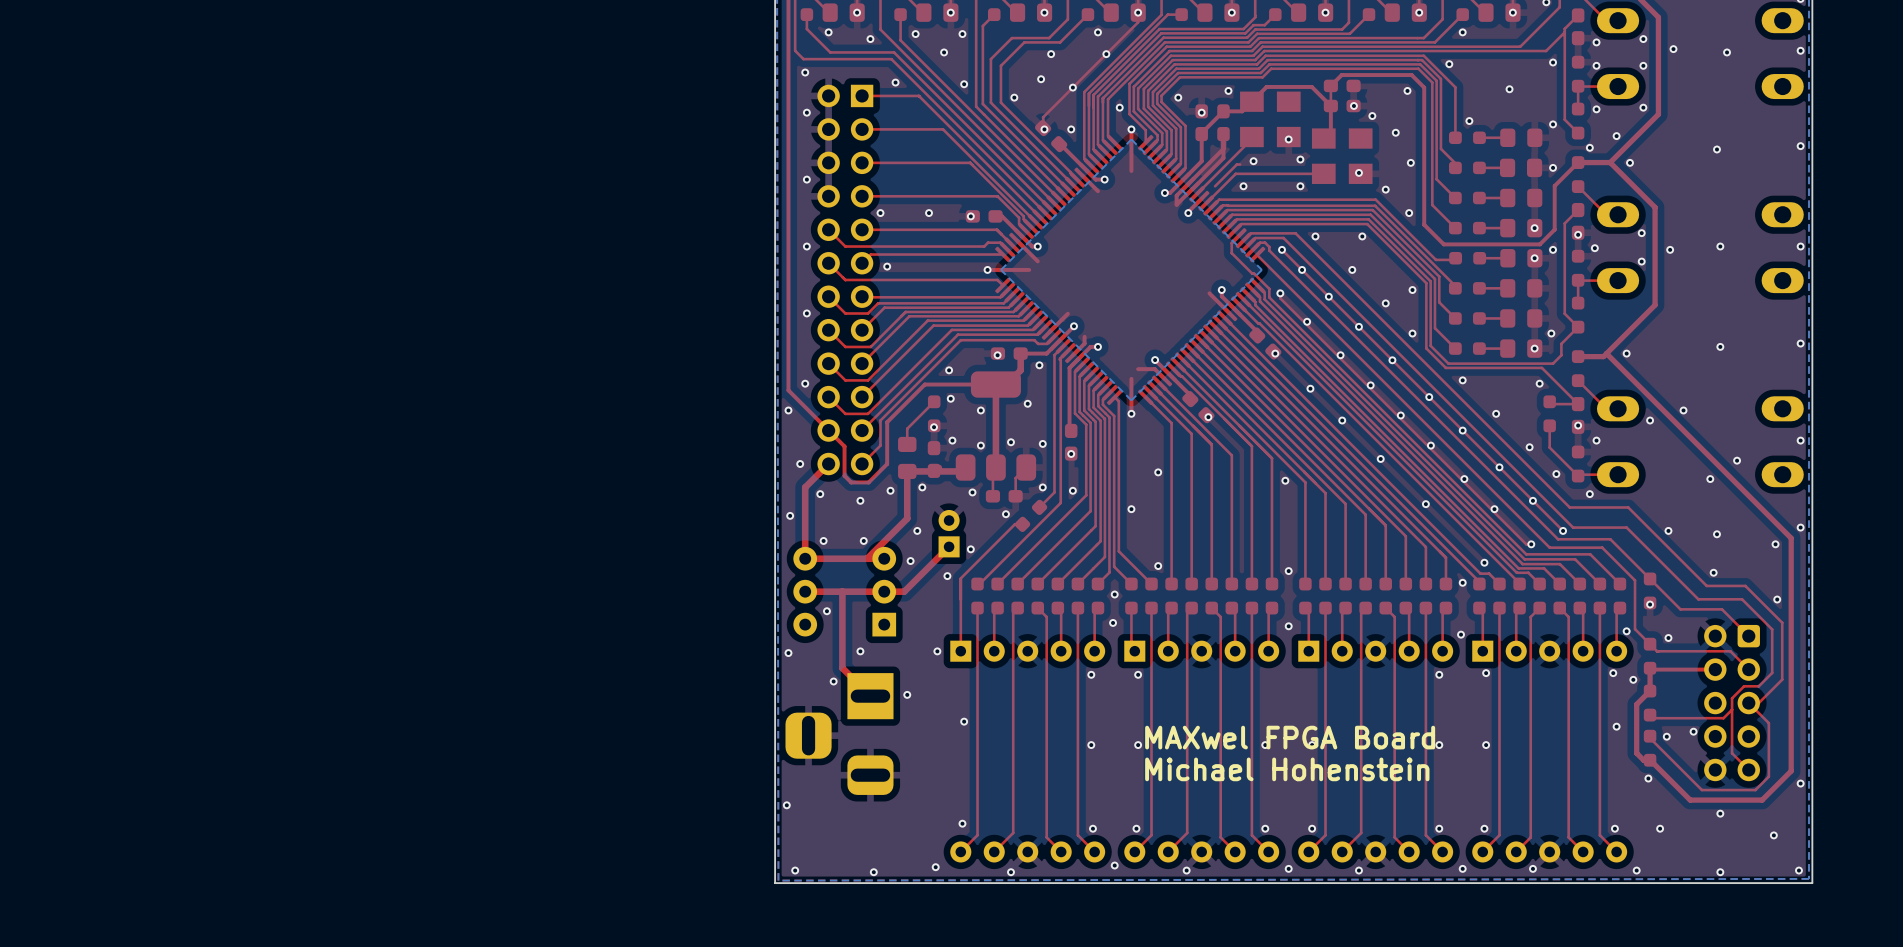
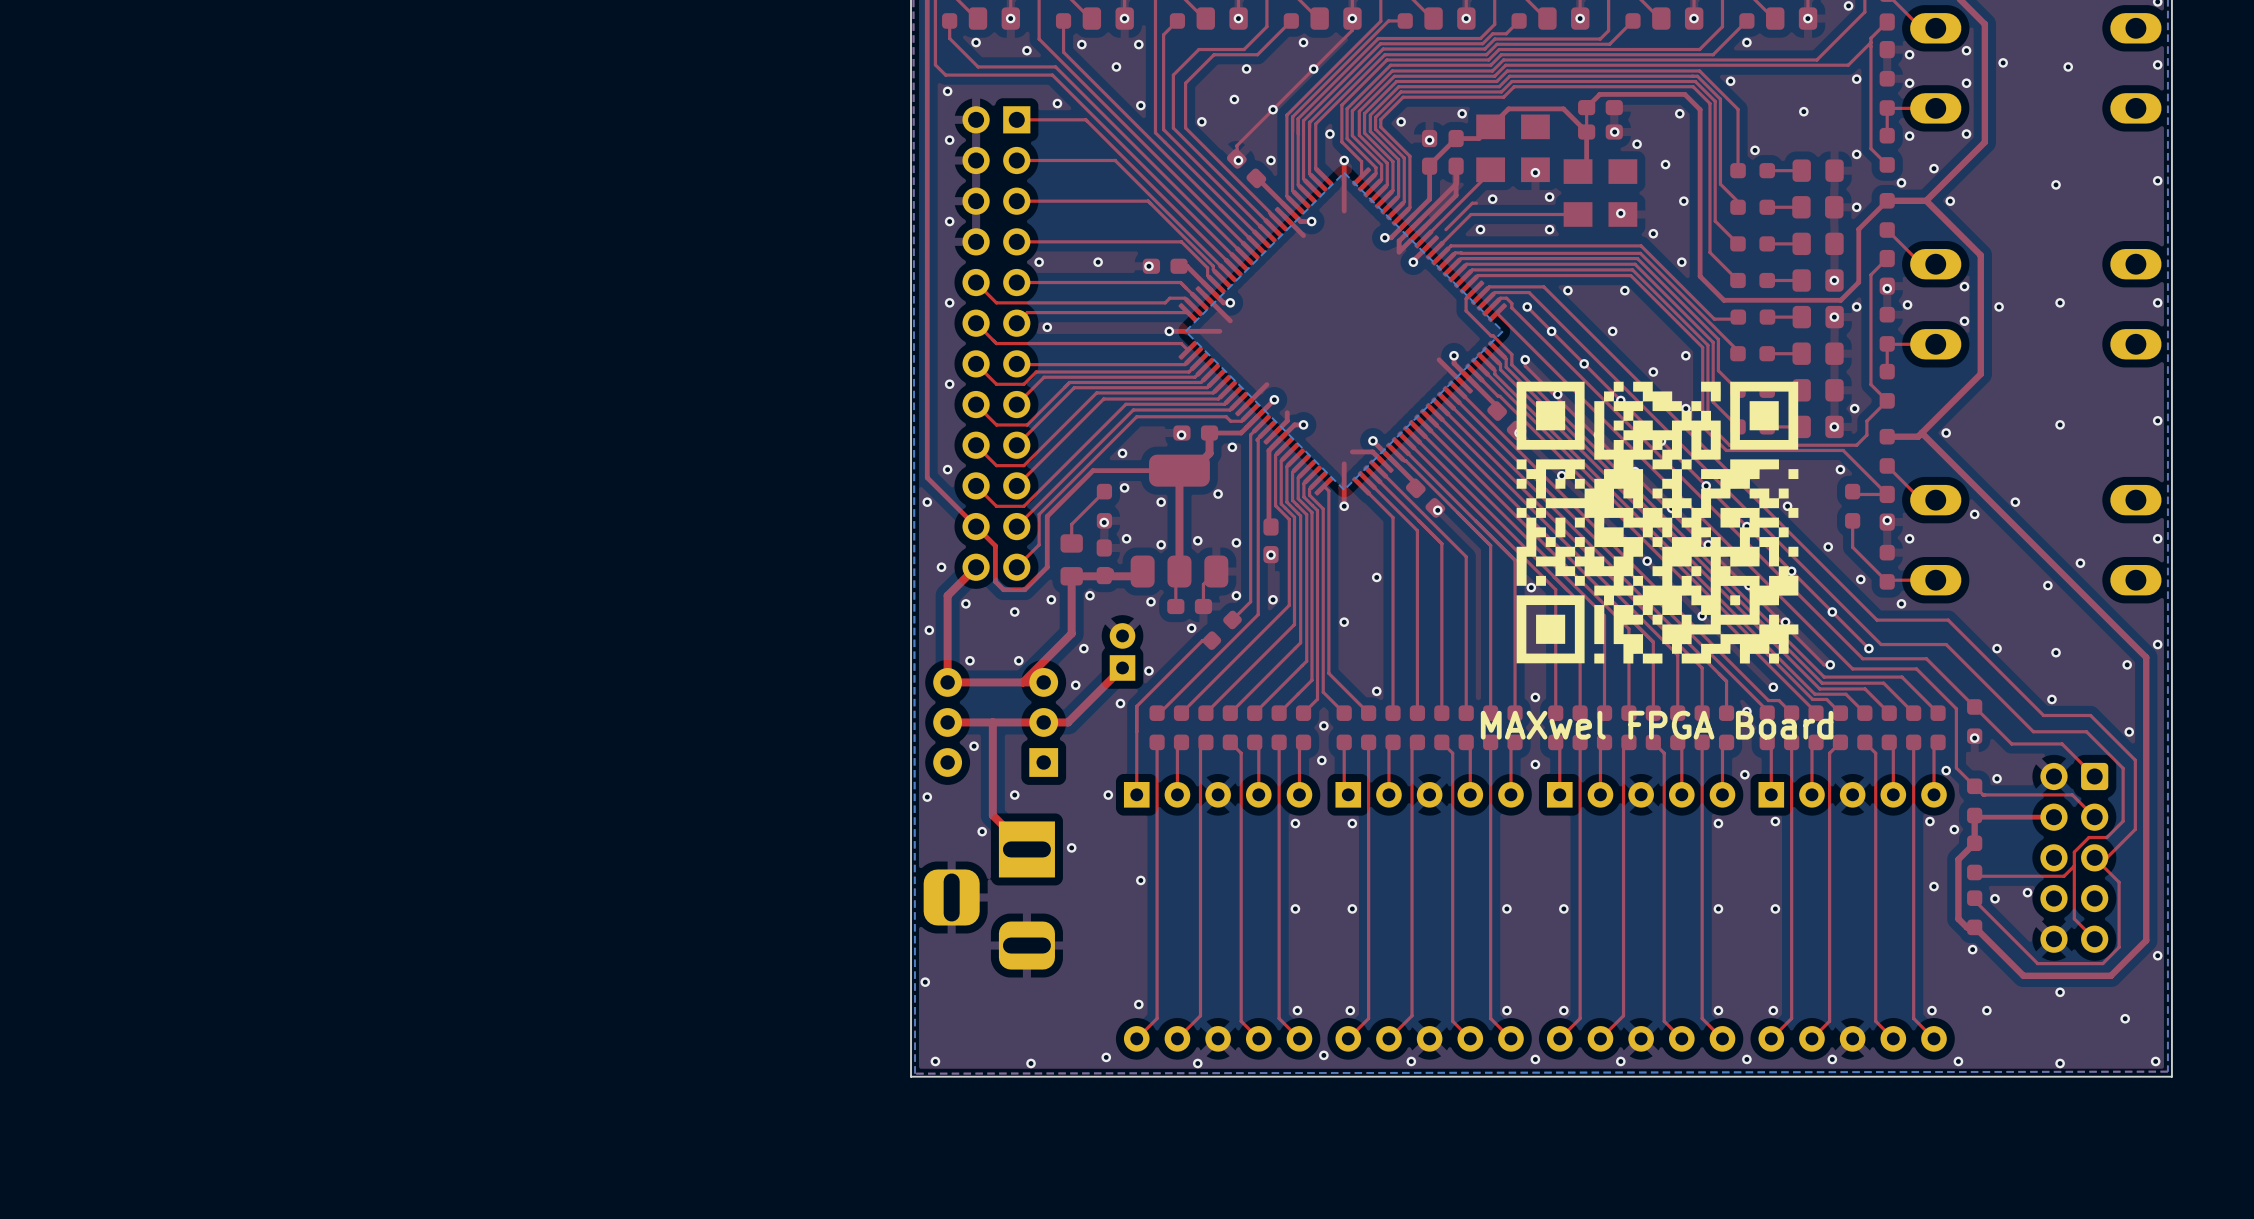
drawing: none -> [1516, 381, 1799, 664]
text position: MAXwel FPGA Board (1290, 737) -> MAXwel FPGA Board (1657, 725)
text: Michael Hohenstein (1287, 769) -> none

